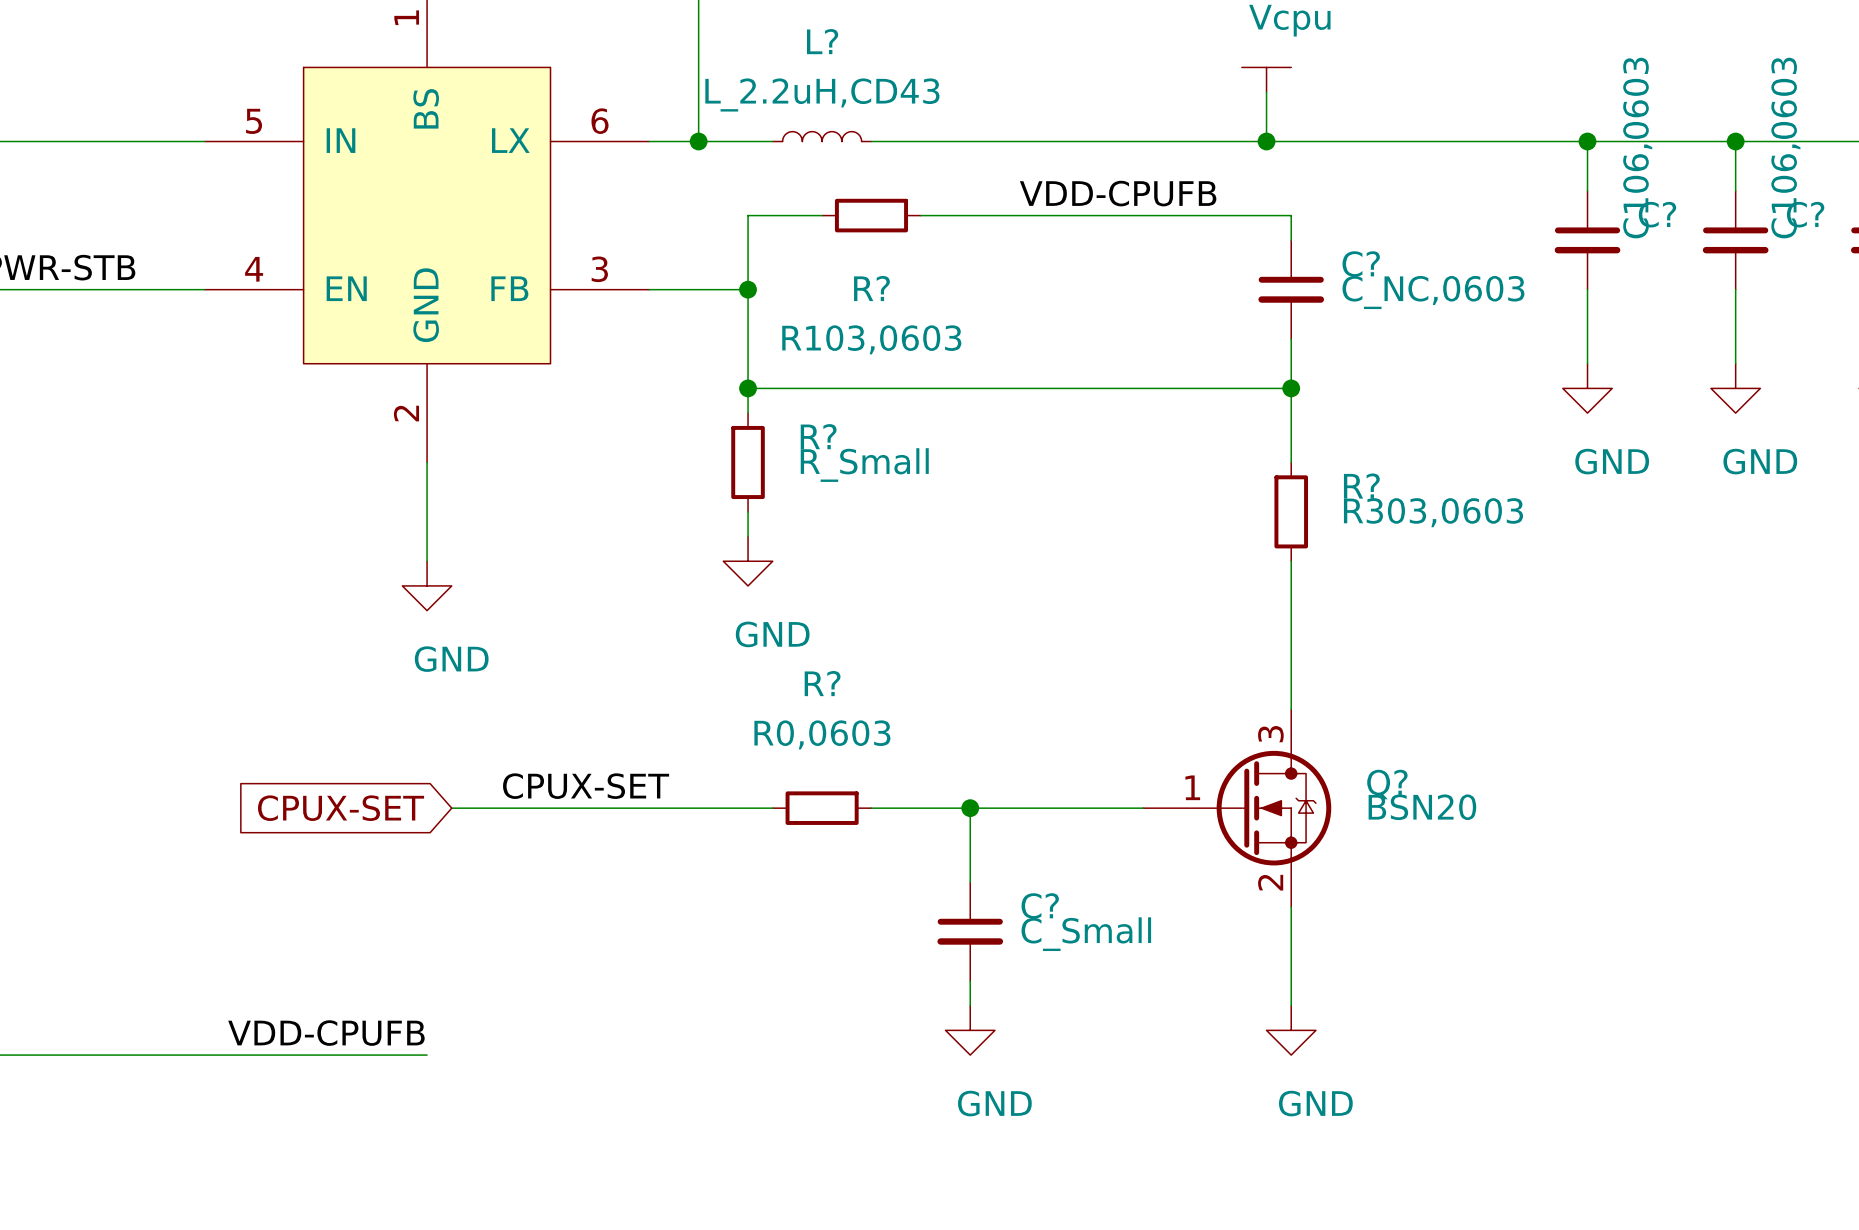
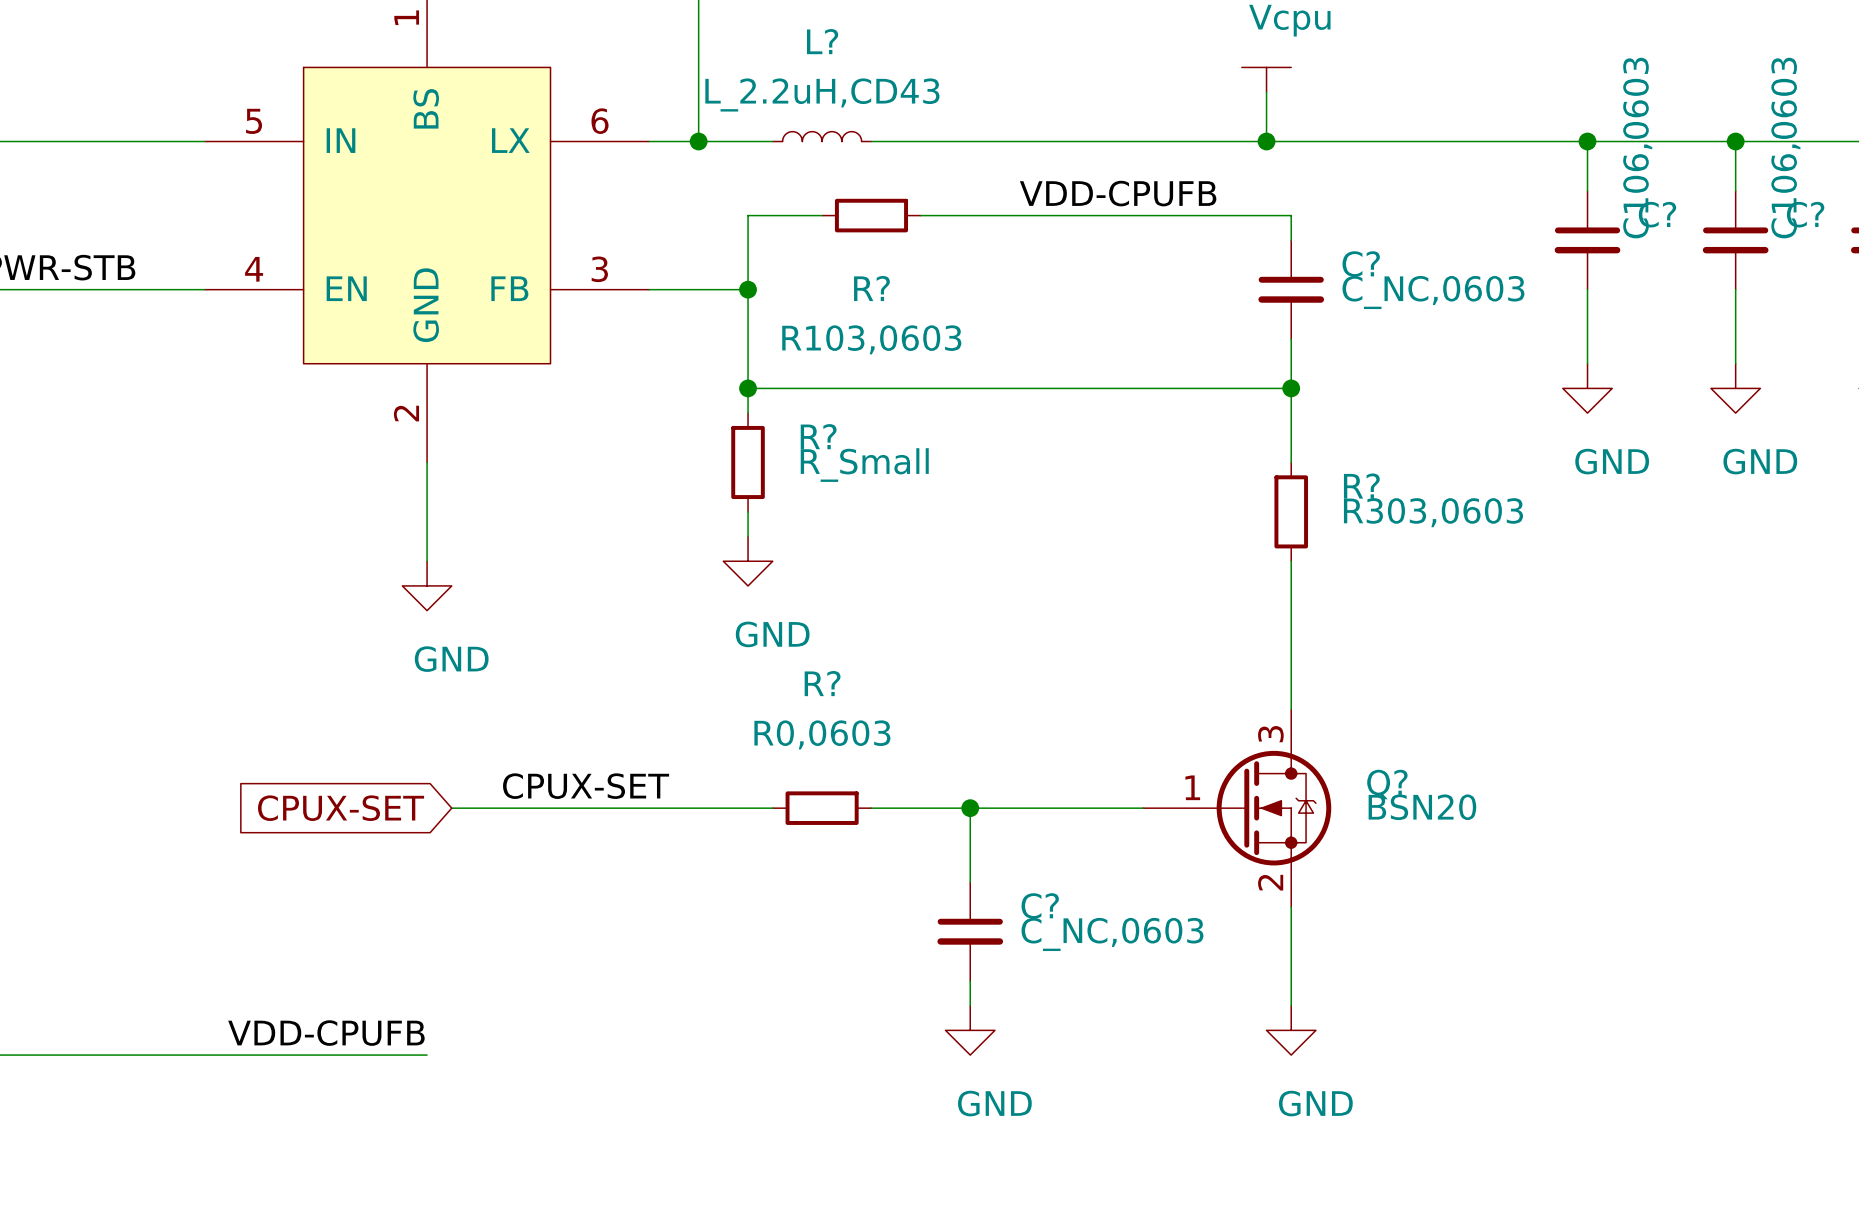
C? value: C_Small (1086, 934) -> C_NC,0603 (1112, 934)

